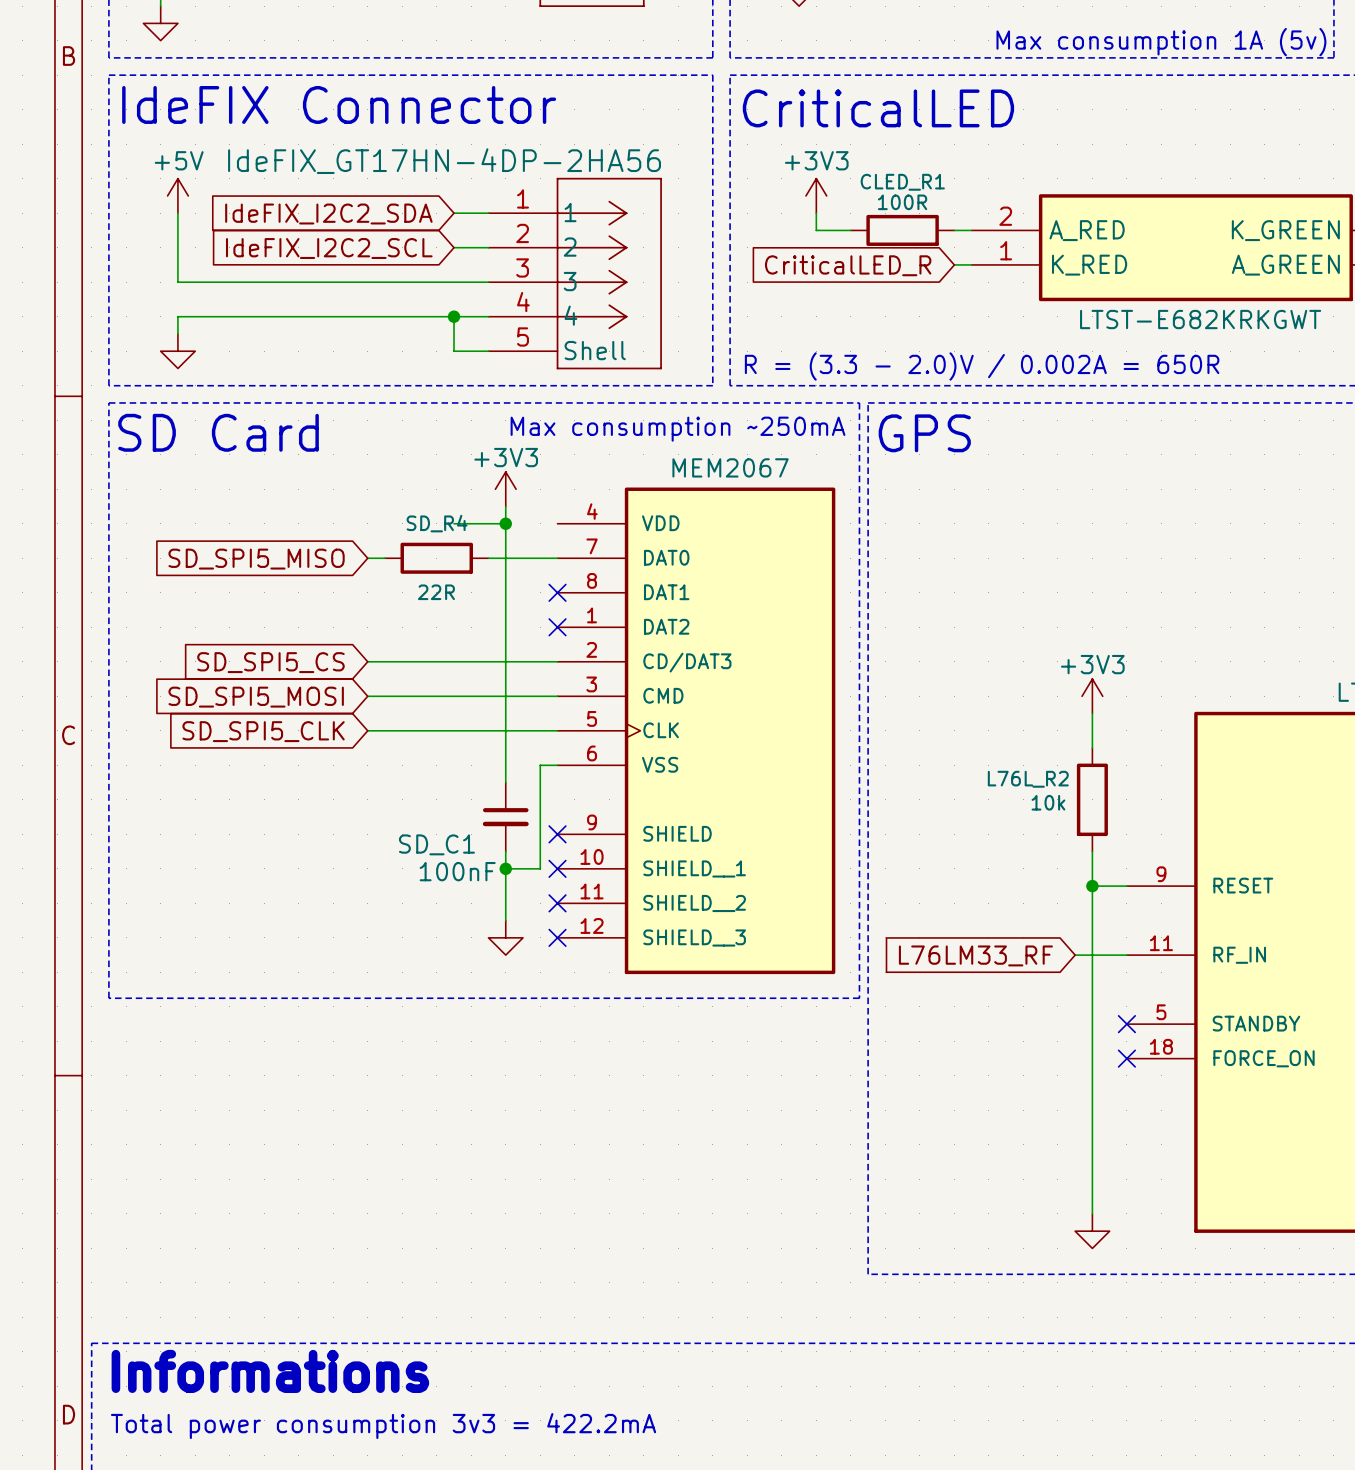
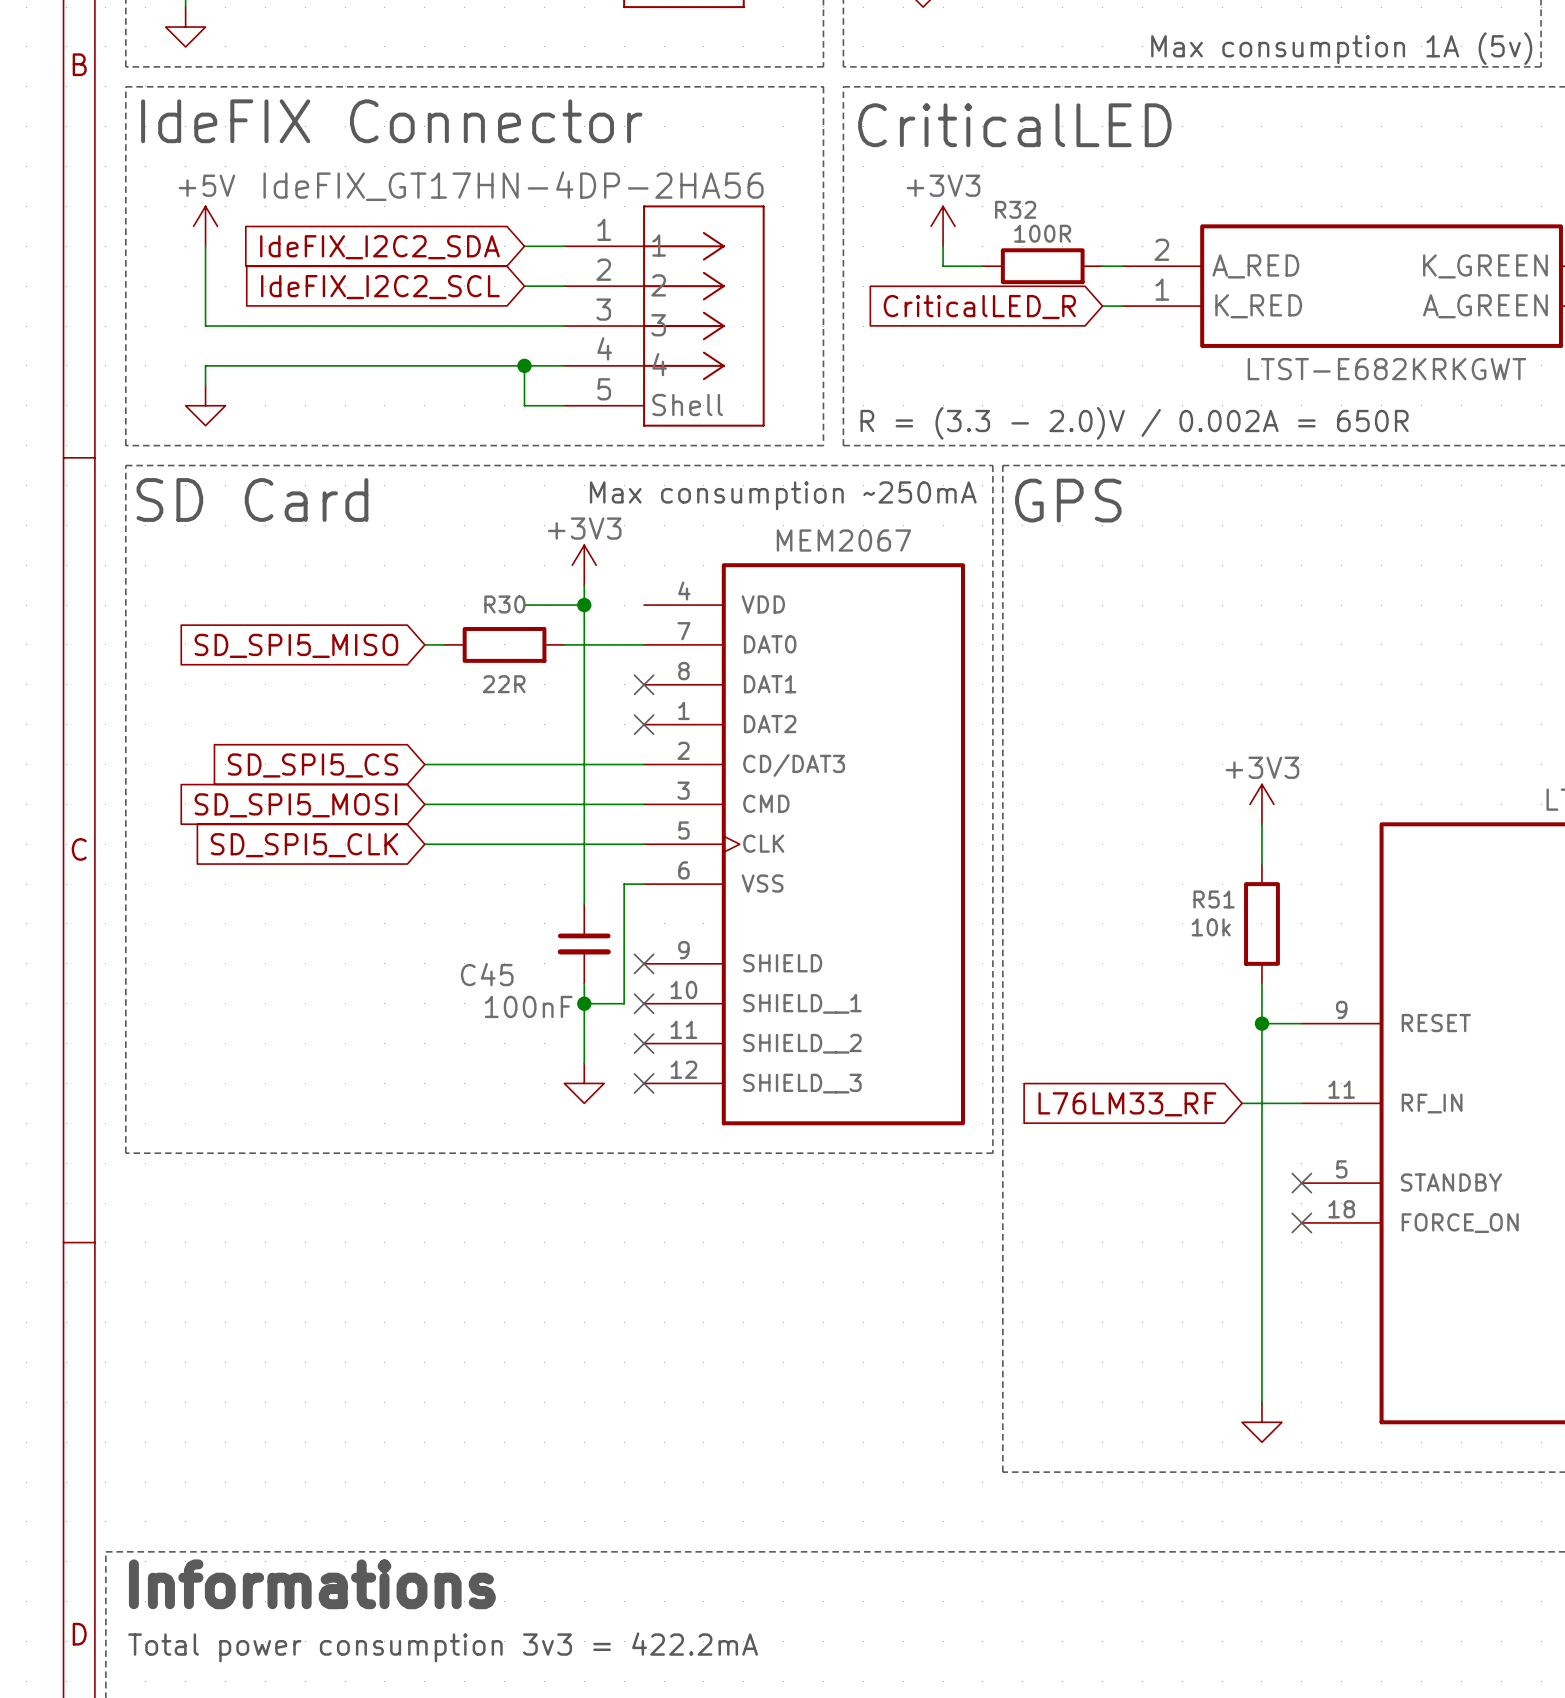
CLED_R1 name: CLED_R1 (902, 182) -> R32 (1015, 209)
SD_R4 name: SD_R4 (437, 523) -> R30 (504, 604)
L76L_R2 name: L76L_R2 (1028, 779) -> R51 (1214, 899)
SD_C1 name: SD_C1 (436, 844) -> C45 (487, 974)

